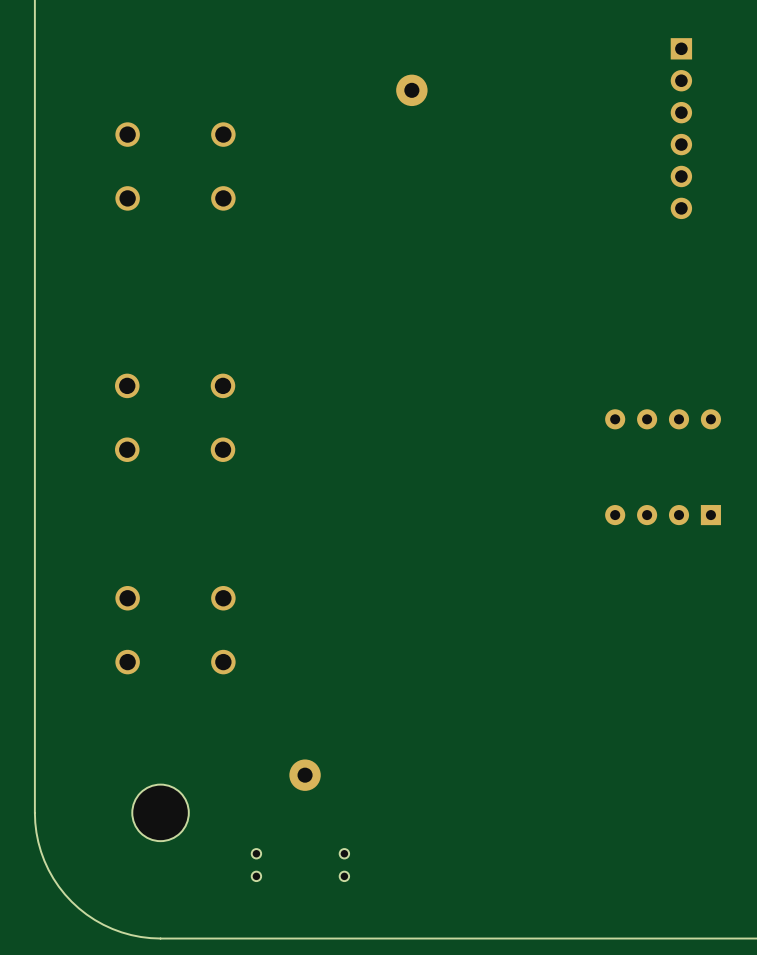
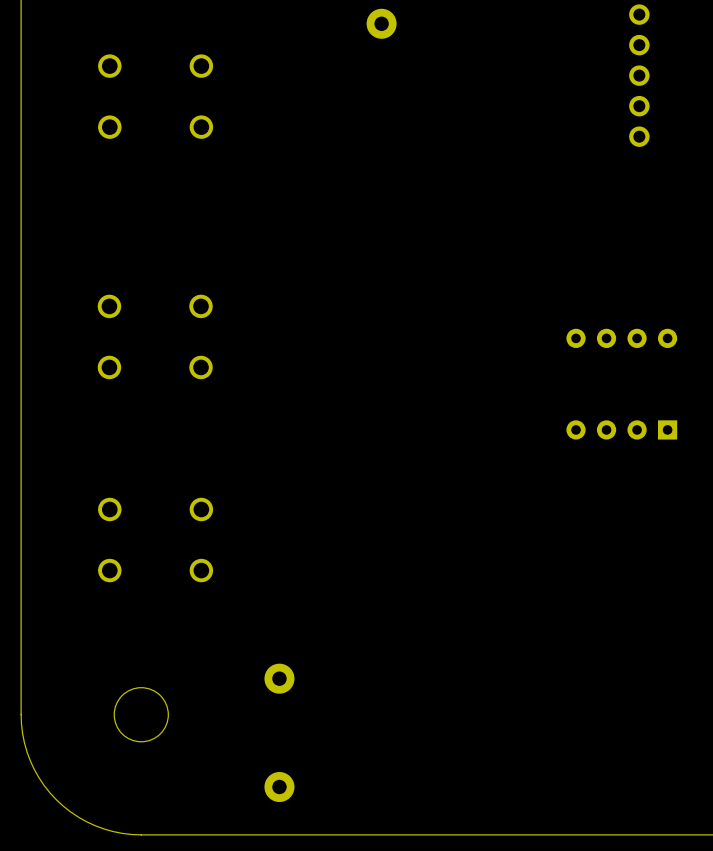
part: (256, 865) -> none
part: (344, 865) -> none
part: none -> (279, 787)

